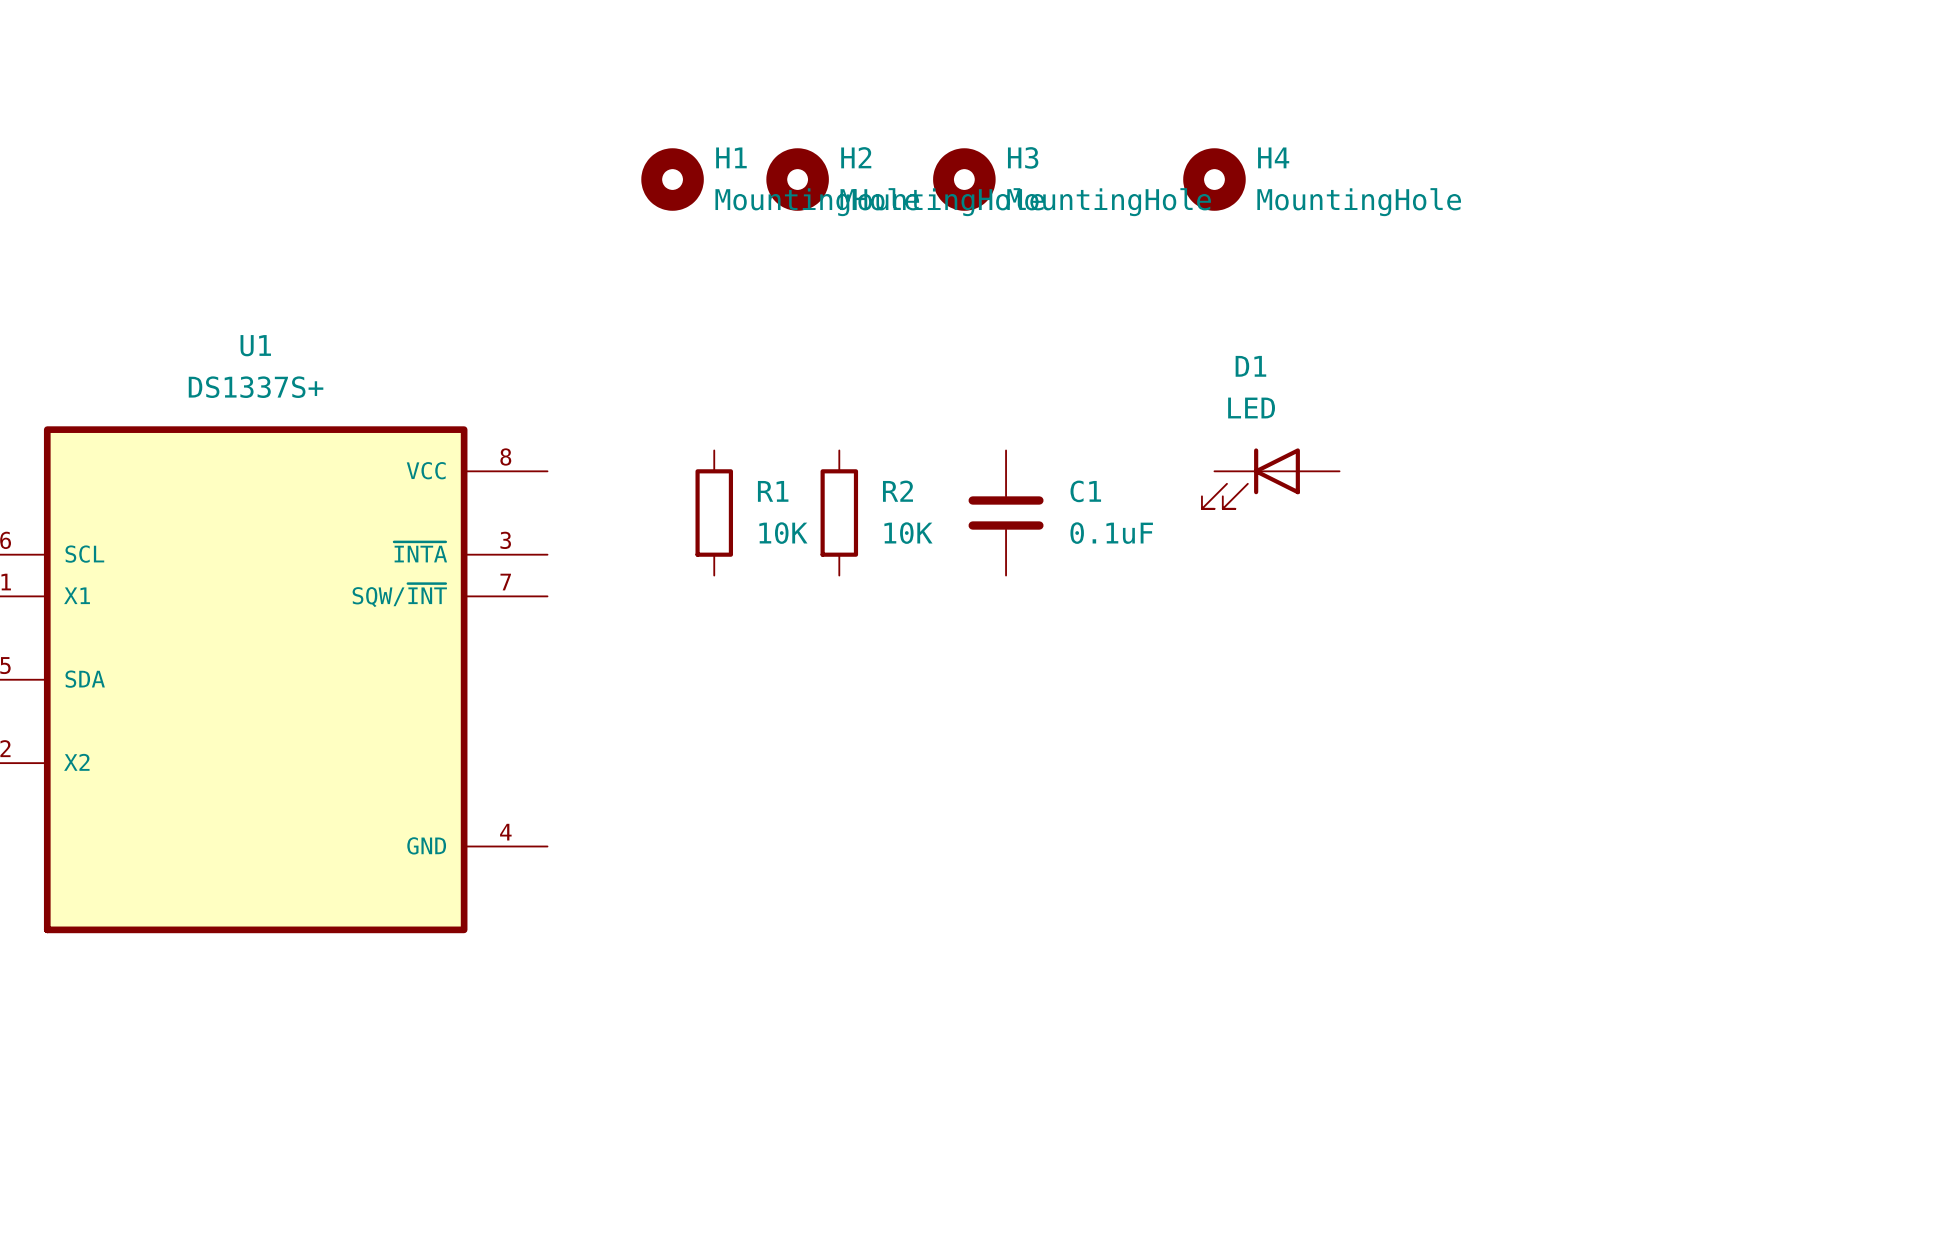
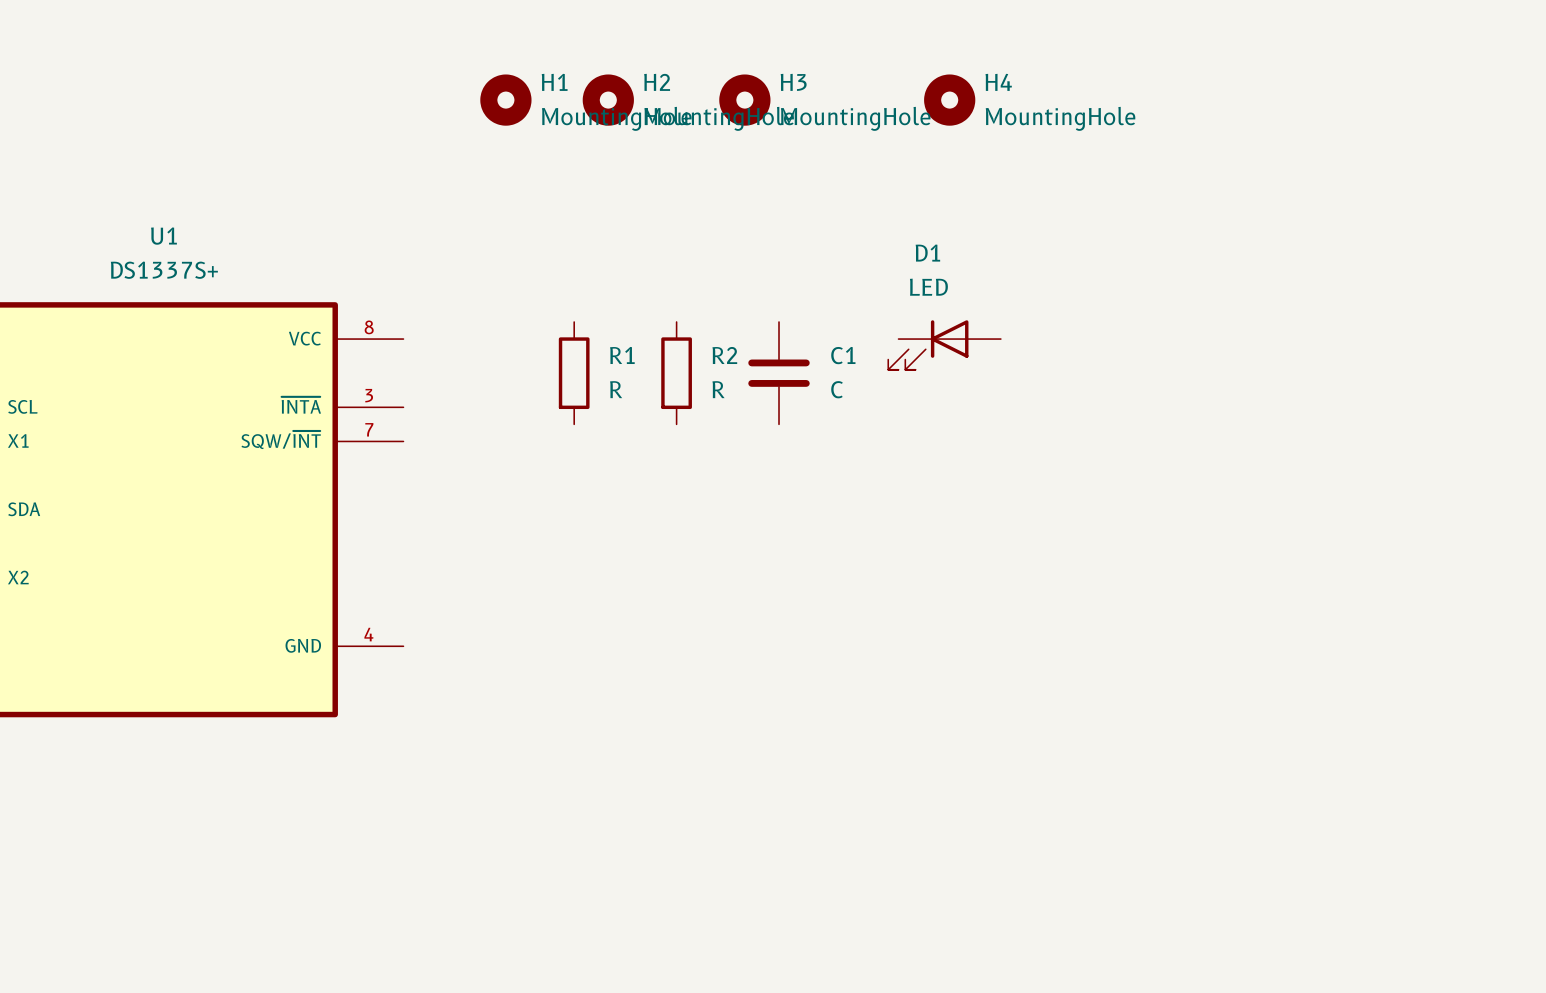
D1 position: (1270, 478) -> (944, 345)
R1 position: (714, 513) -> (574, 373)
R2 position: (839, 513) -> (676, 373)
R1 value: 10K (783, 533) -> R (616, 389)
R2 value: 10K (908, 533) -> R (718, 389)
C1 value: 0.1uF (1111, 533) -> C (837, 389)

